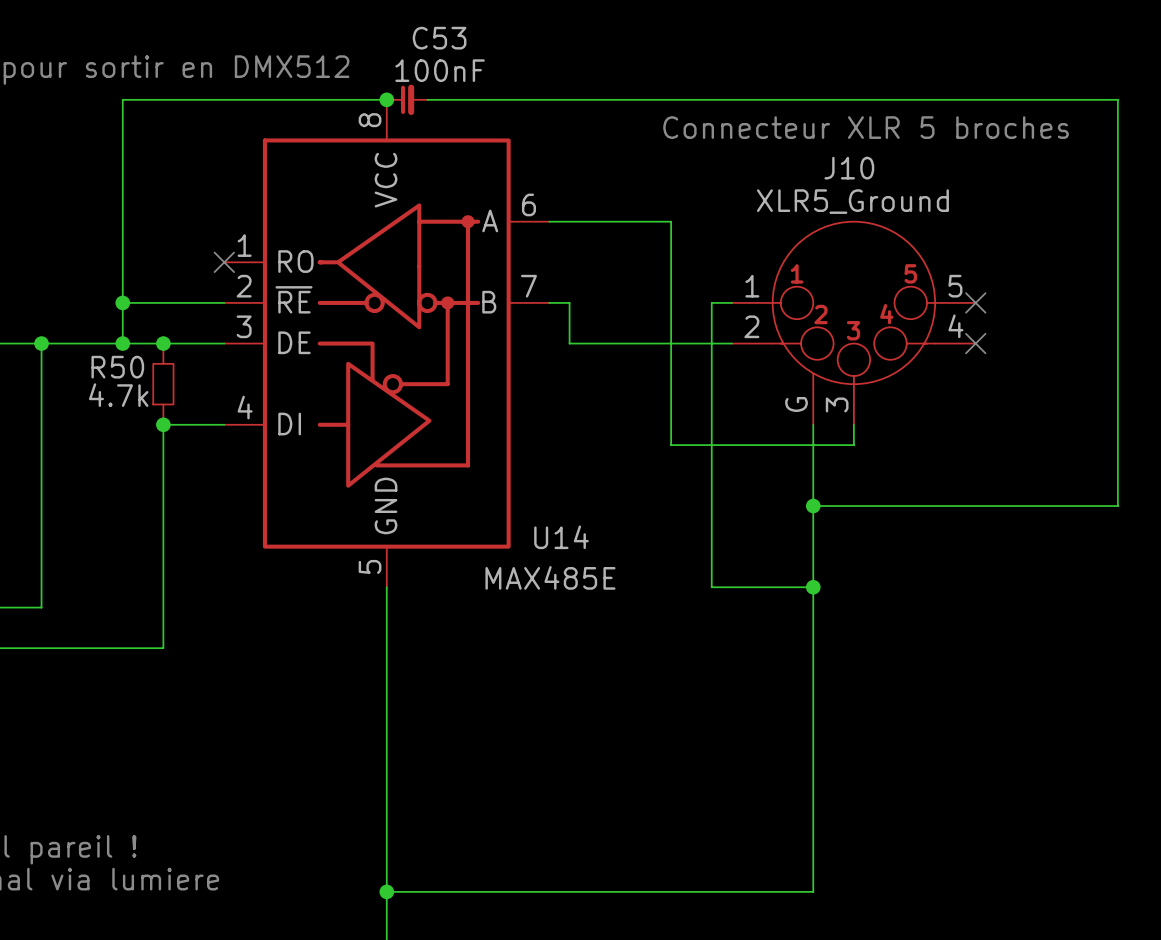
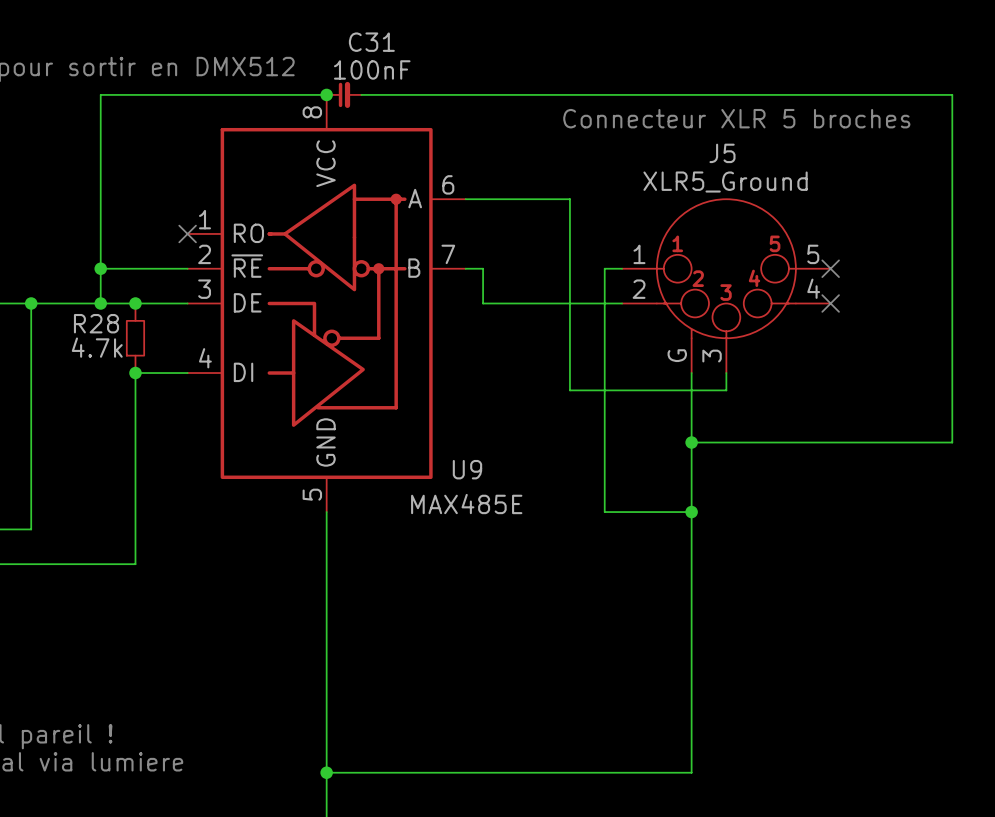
C53 name: C53 (439, 38) -> C31 (371, 42)
J10 name: J10 (849, 168) -> J5 (722, 153)
R50 name: R50 (117, 367) -> R28 (96, 323)
U14 name: U14 (561, 537) -> U9 (467, 469)

